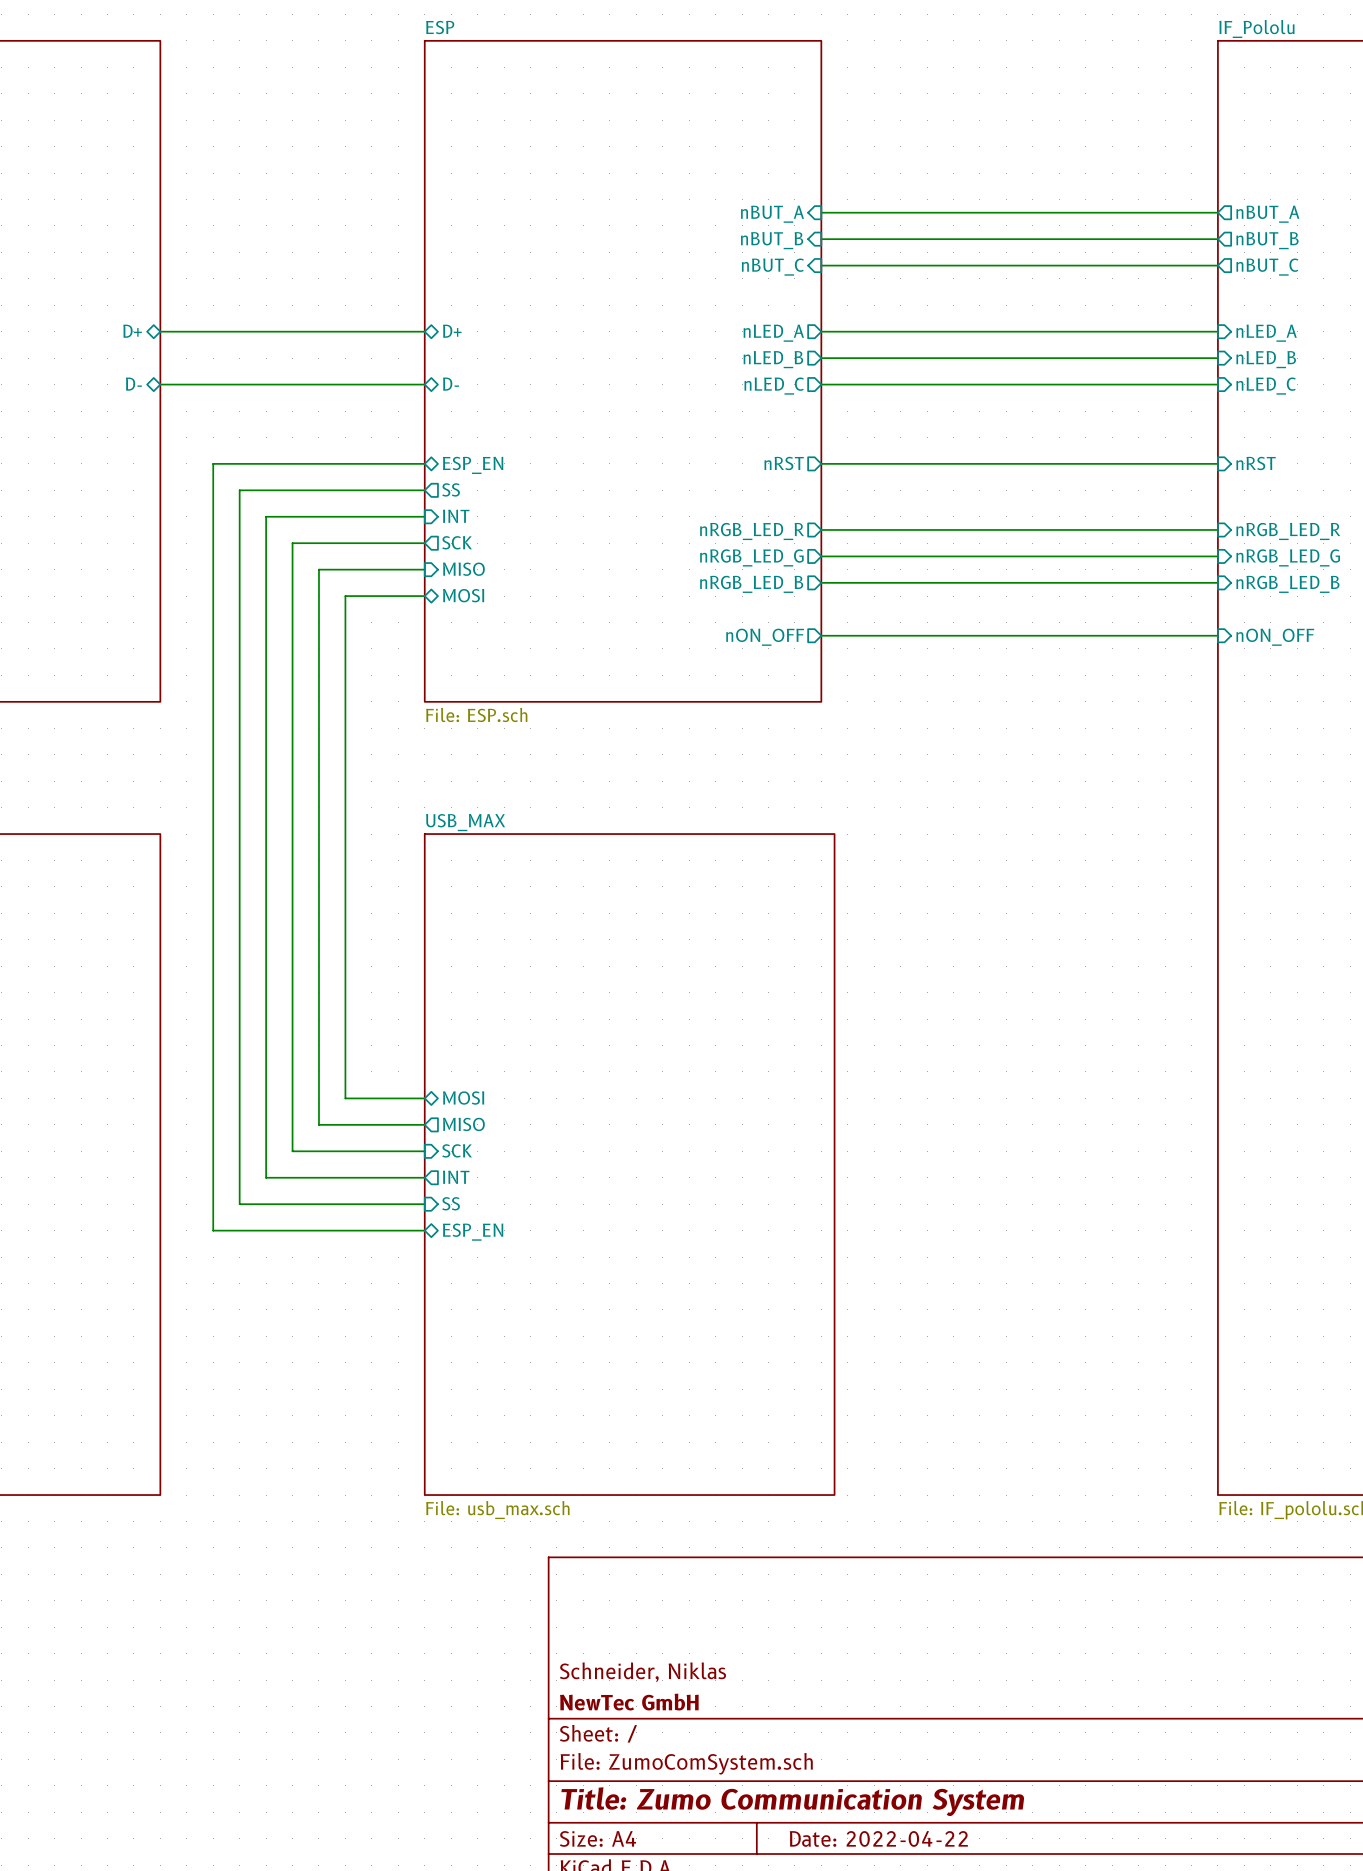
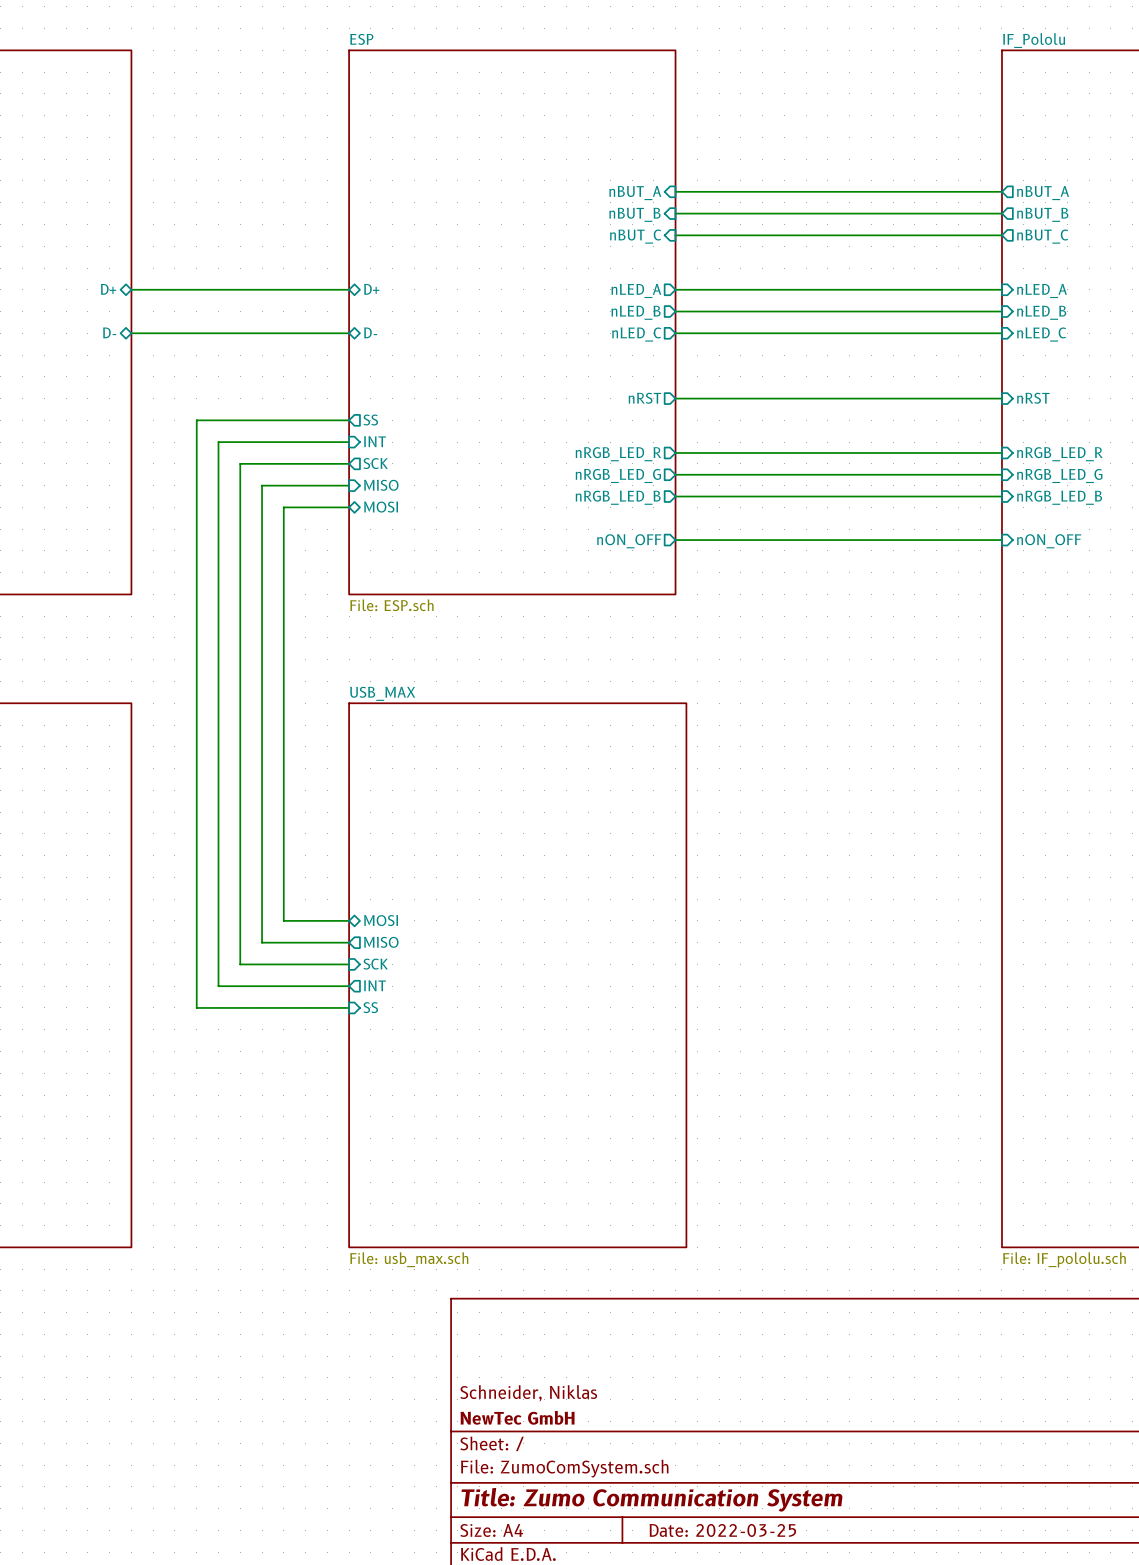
wire: (424, 463) (213, 463) (213, 1230) (424, 1230) -> none
sheet pin: ESP_EN (473, 465) -> none
sheet pin: ESP_EN (473, 1232) -> none
title block: Date: 2022-04-22 (878, 1838) -> Date: 2022-03-25 (722, 1530)

